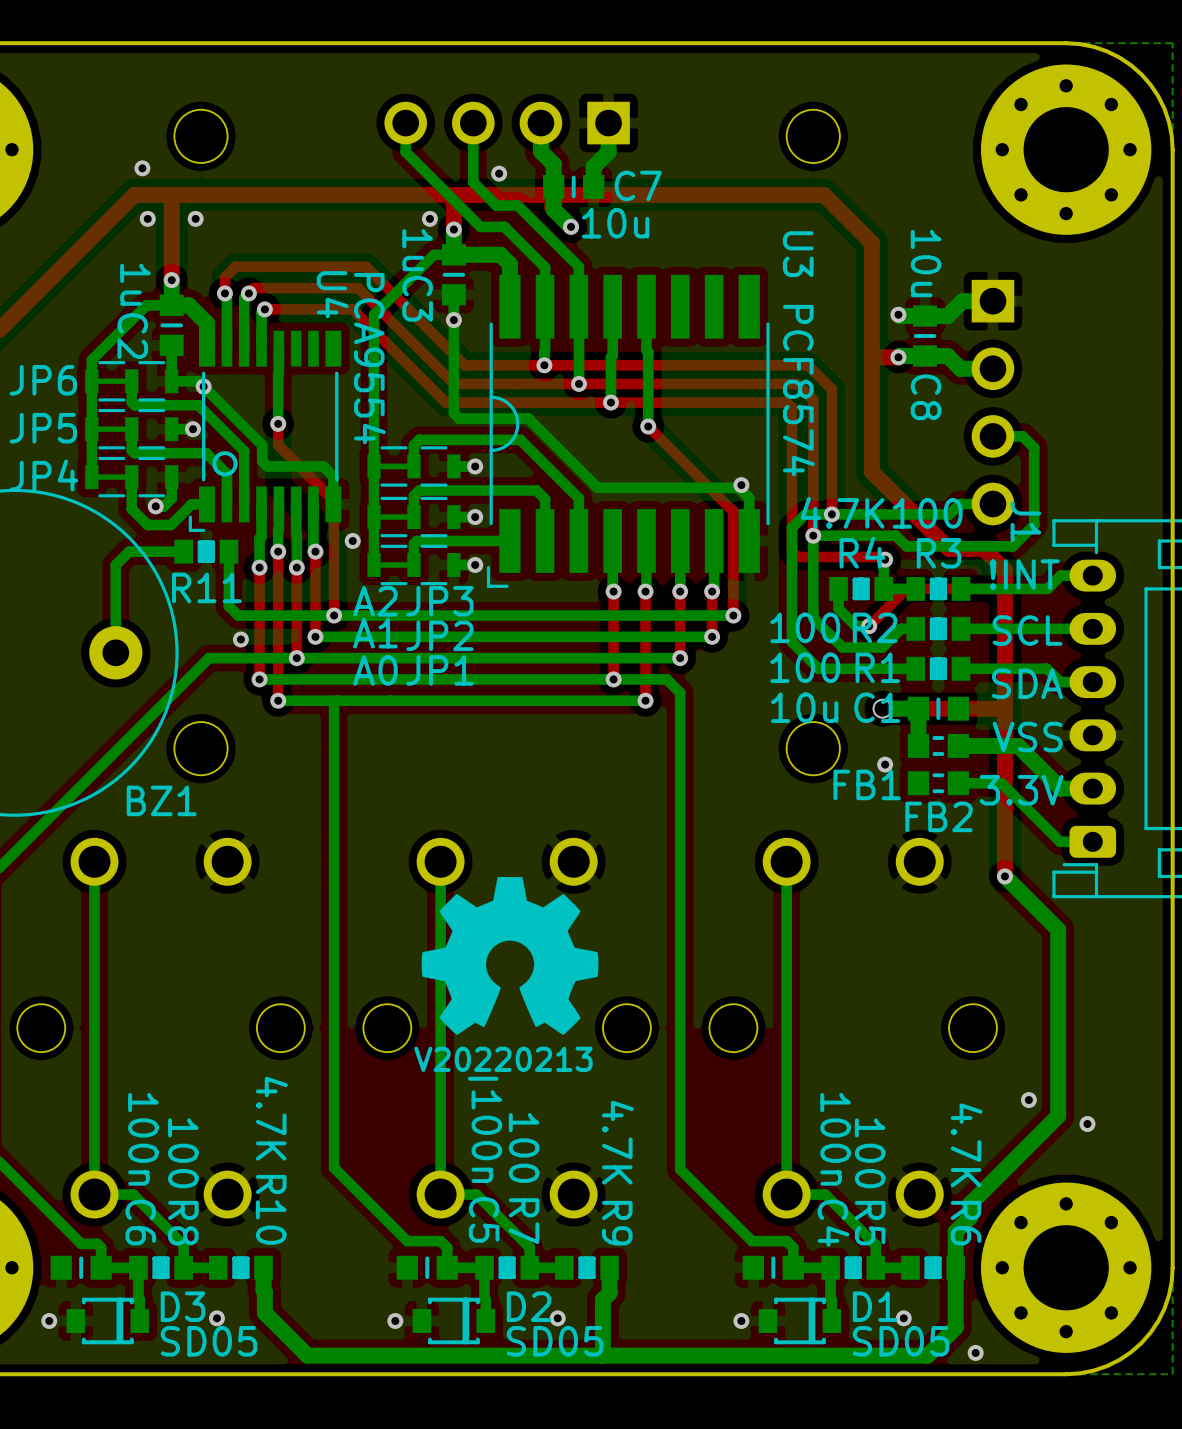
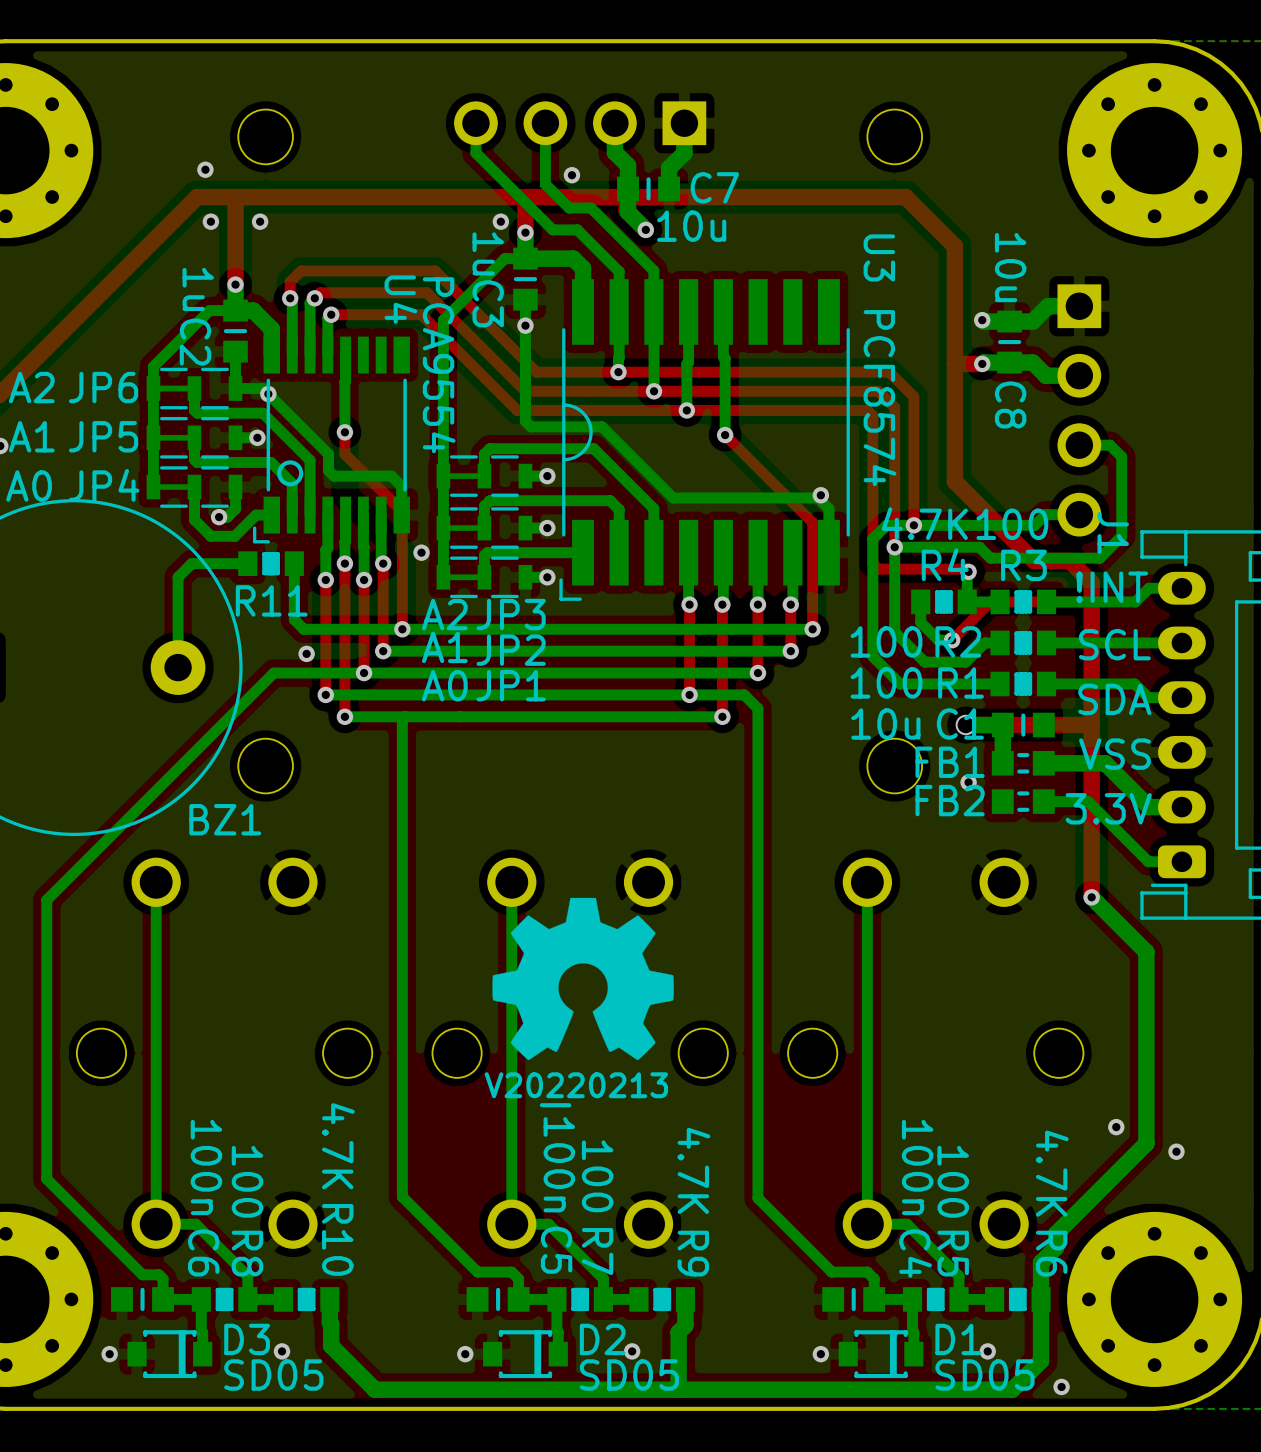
FB1 name position: FB1 (867, 784) -> FB1 (950, 762)
FB2 name position: FB2 (939, 816) -> FB2 (950, 800)

